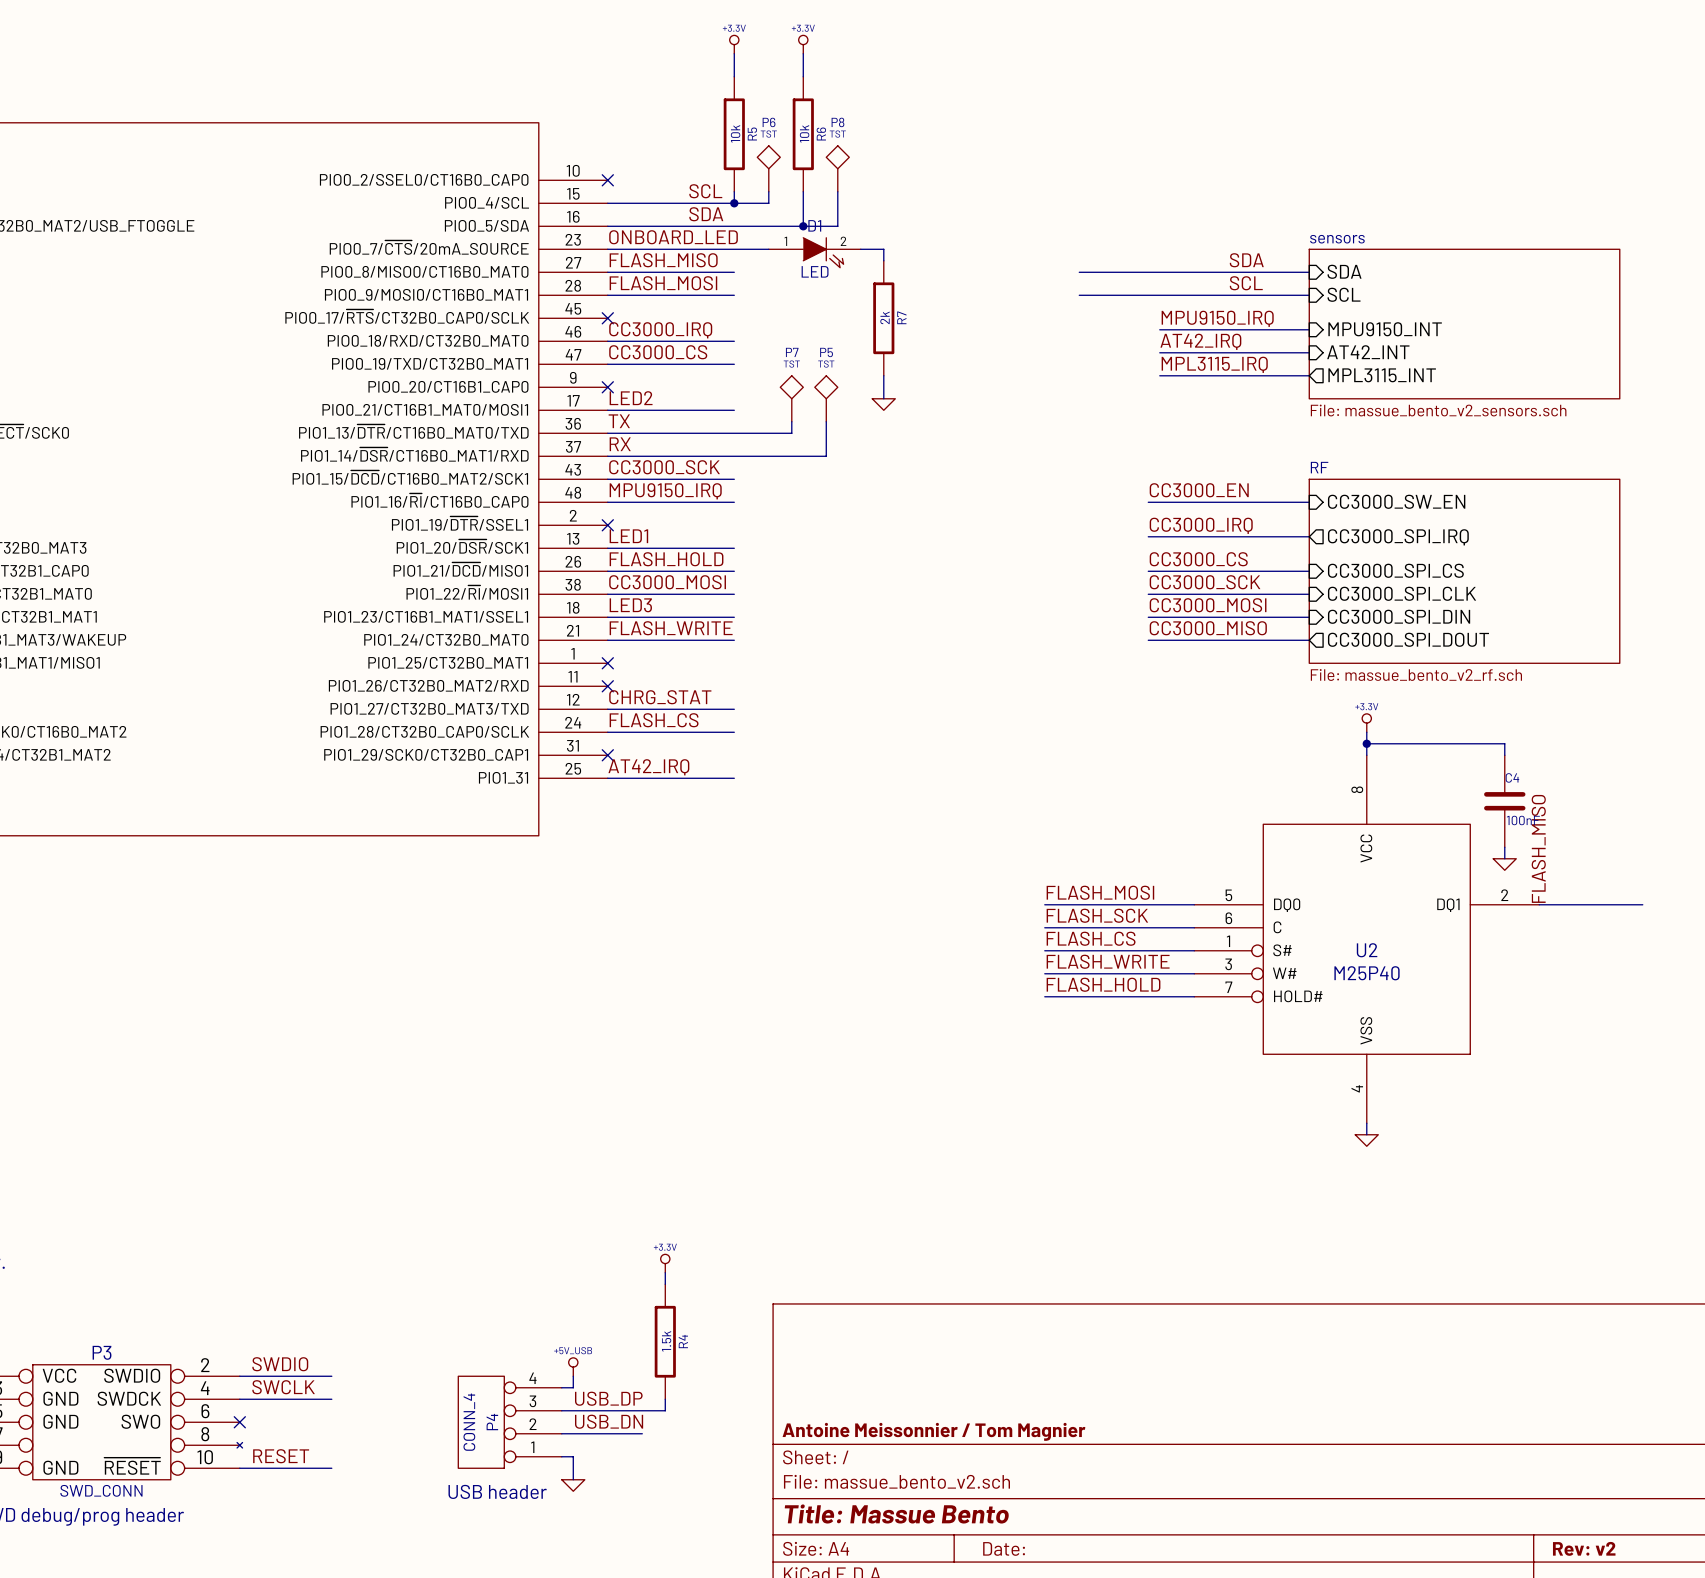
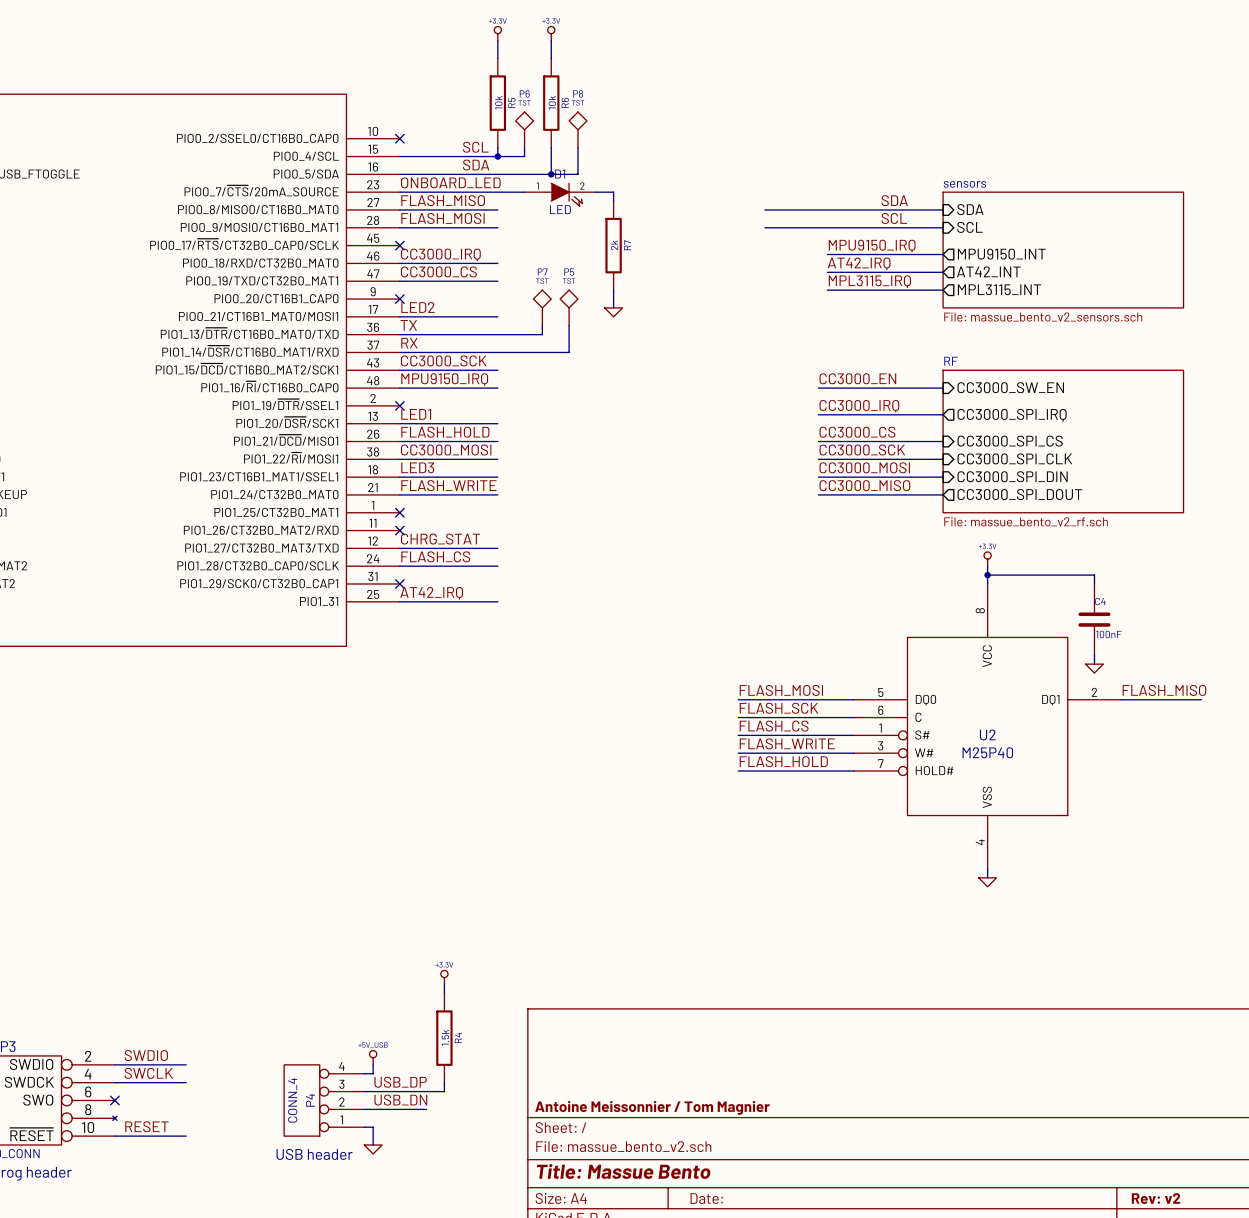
sheet pin shape: input (1385, 329) -> output (1001, 254)
sheet pin shape: input (1368, 352) -> output (988, 271)
label rotation: 0° (1538, 848) -> 90° clockwise (1164, 690)

